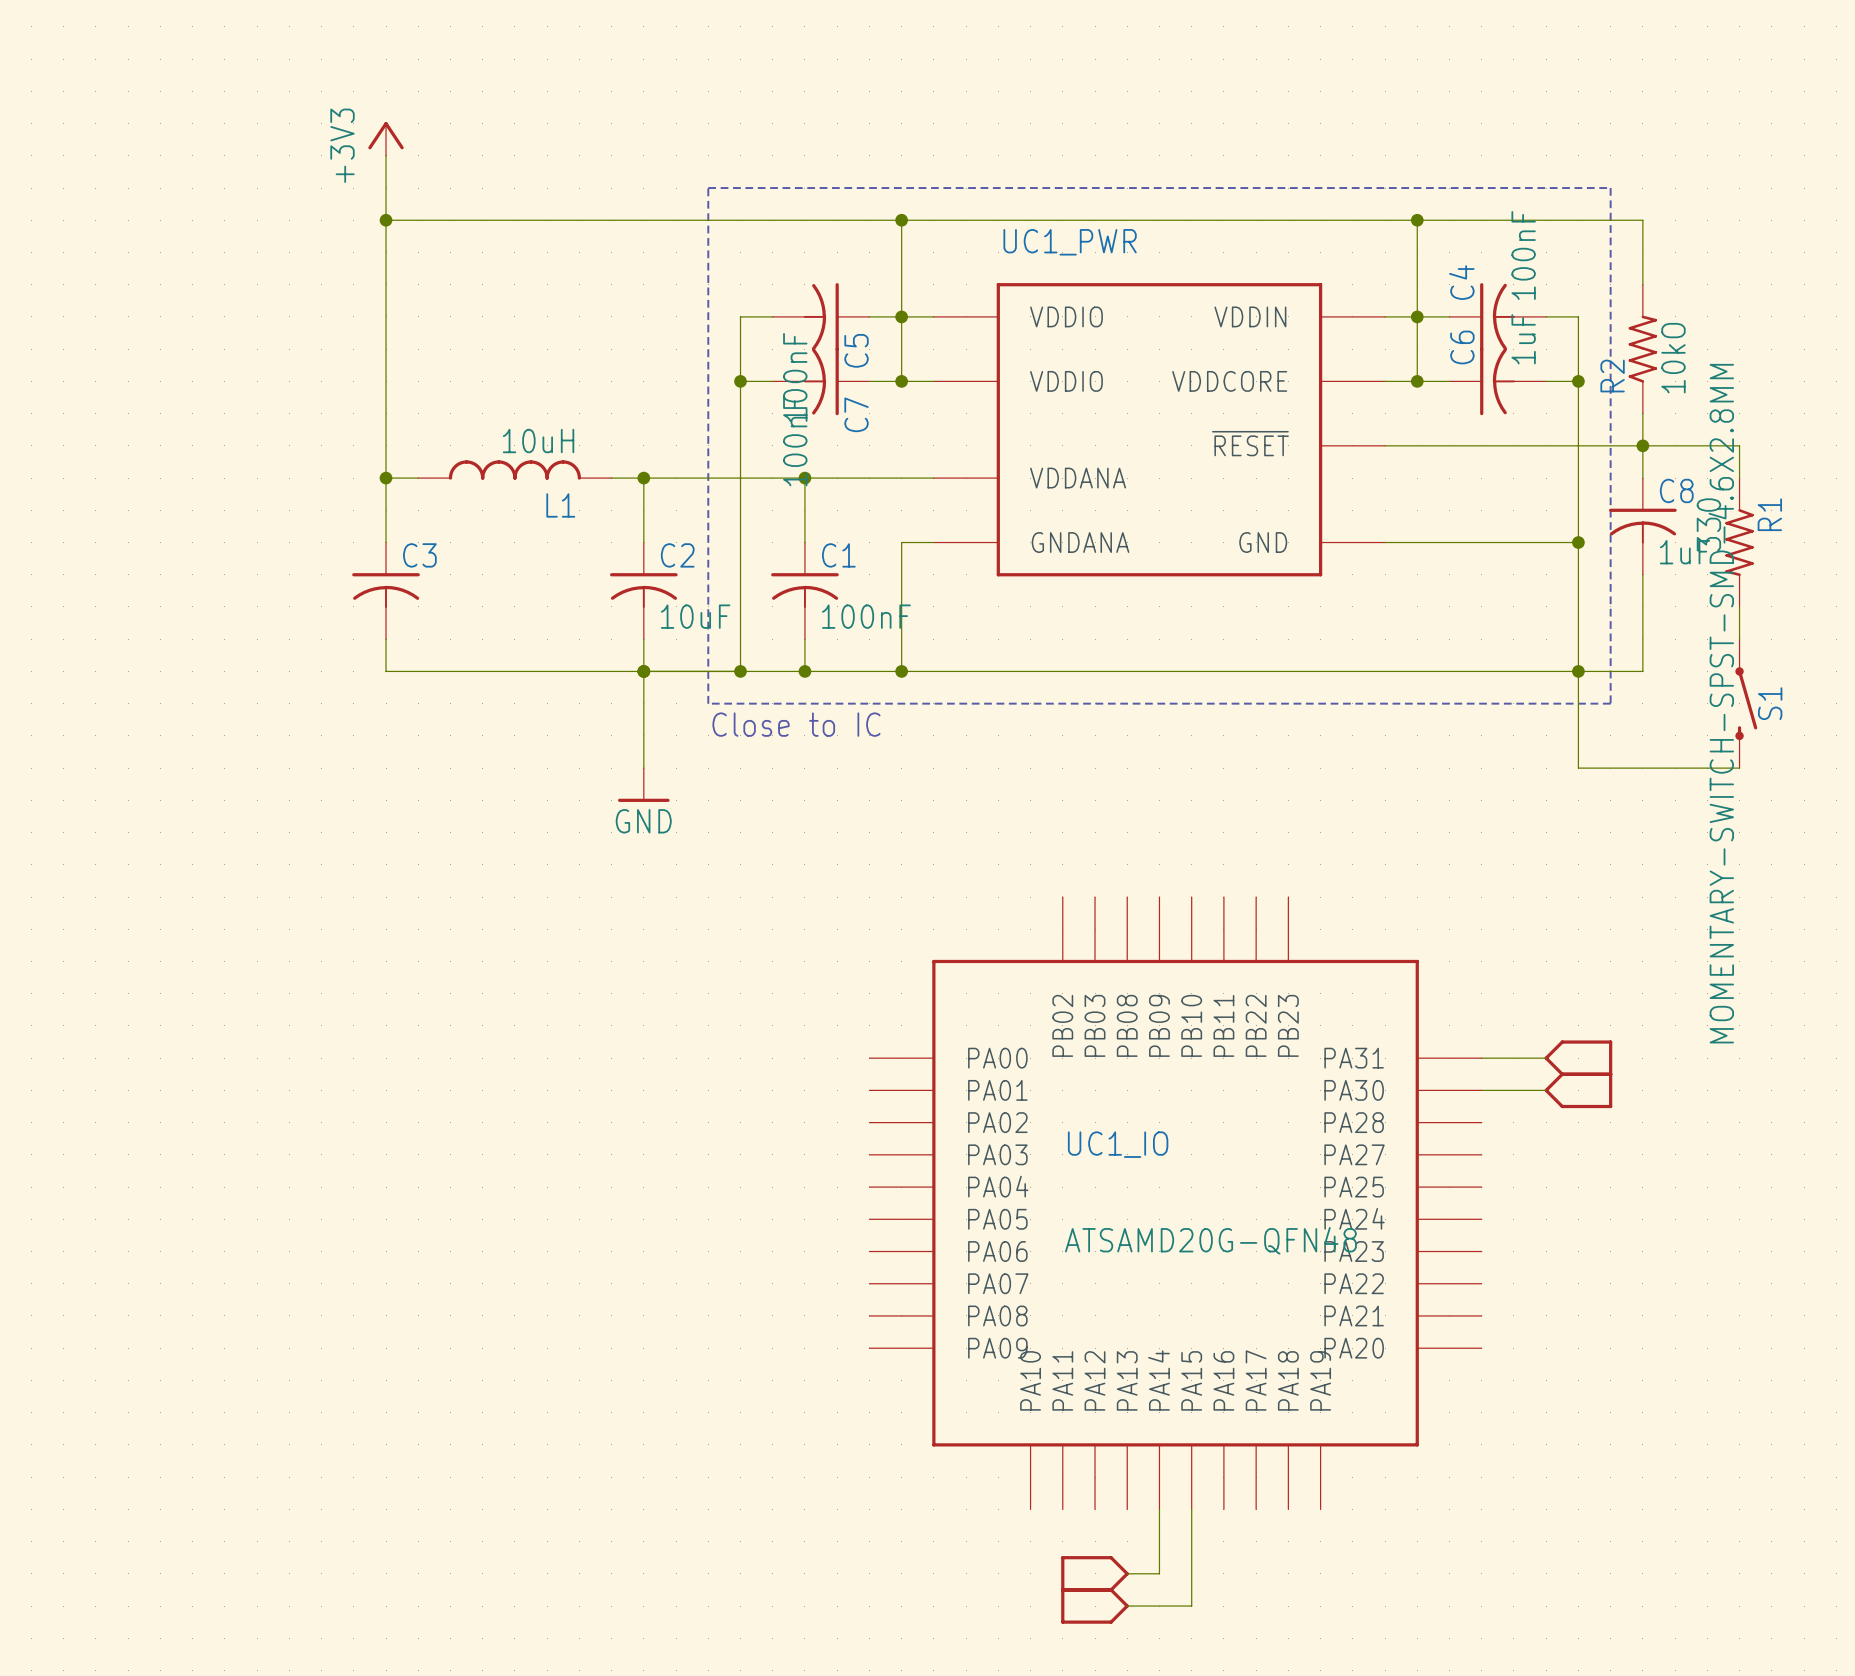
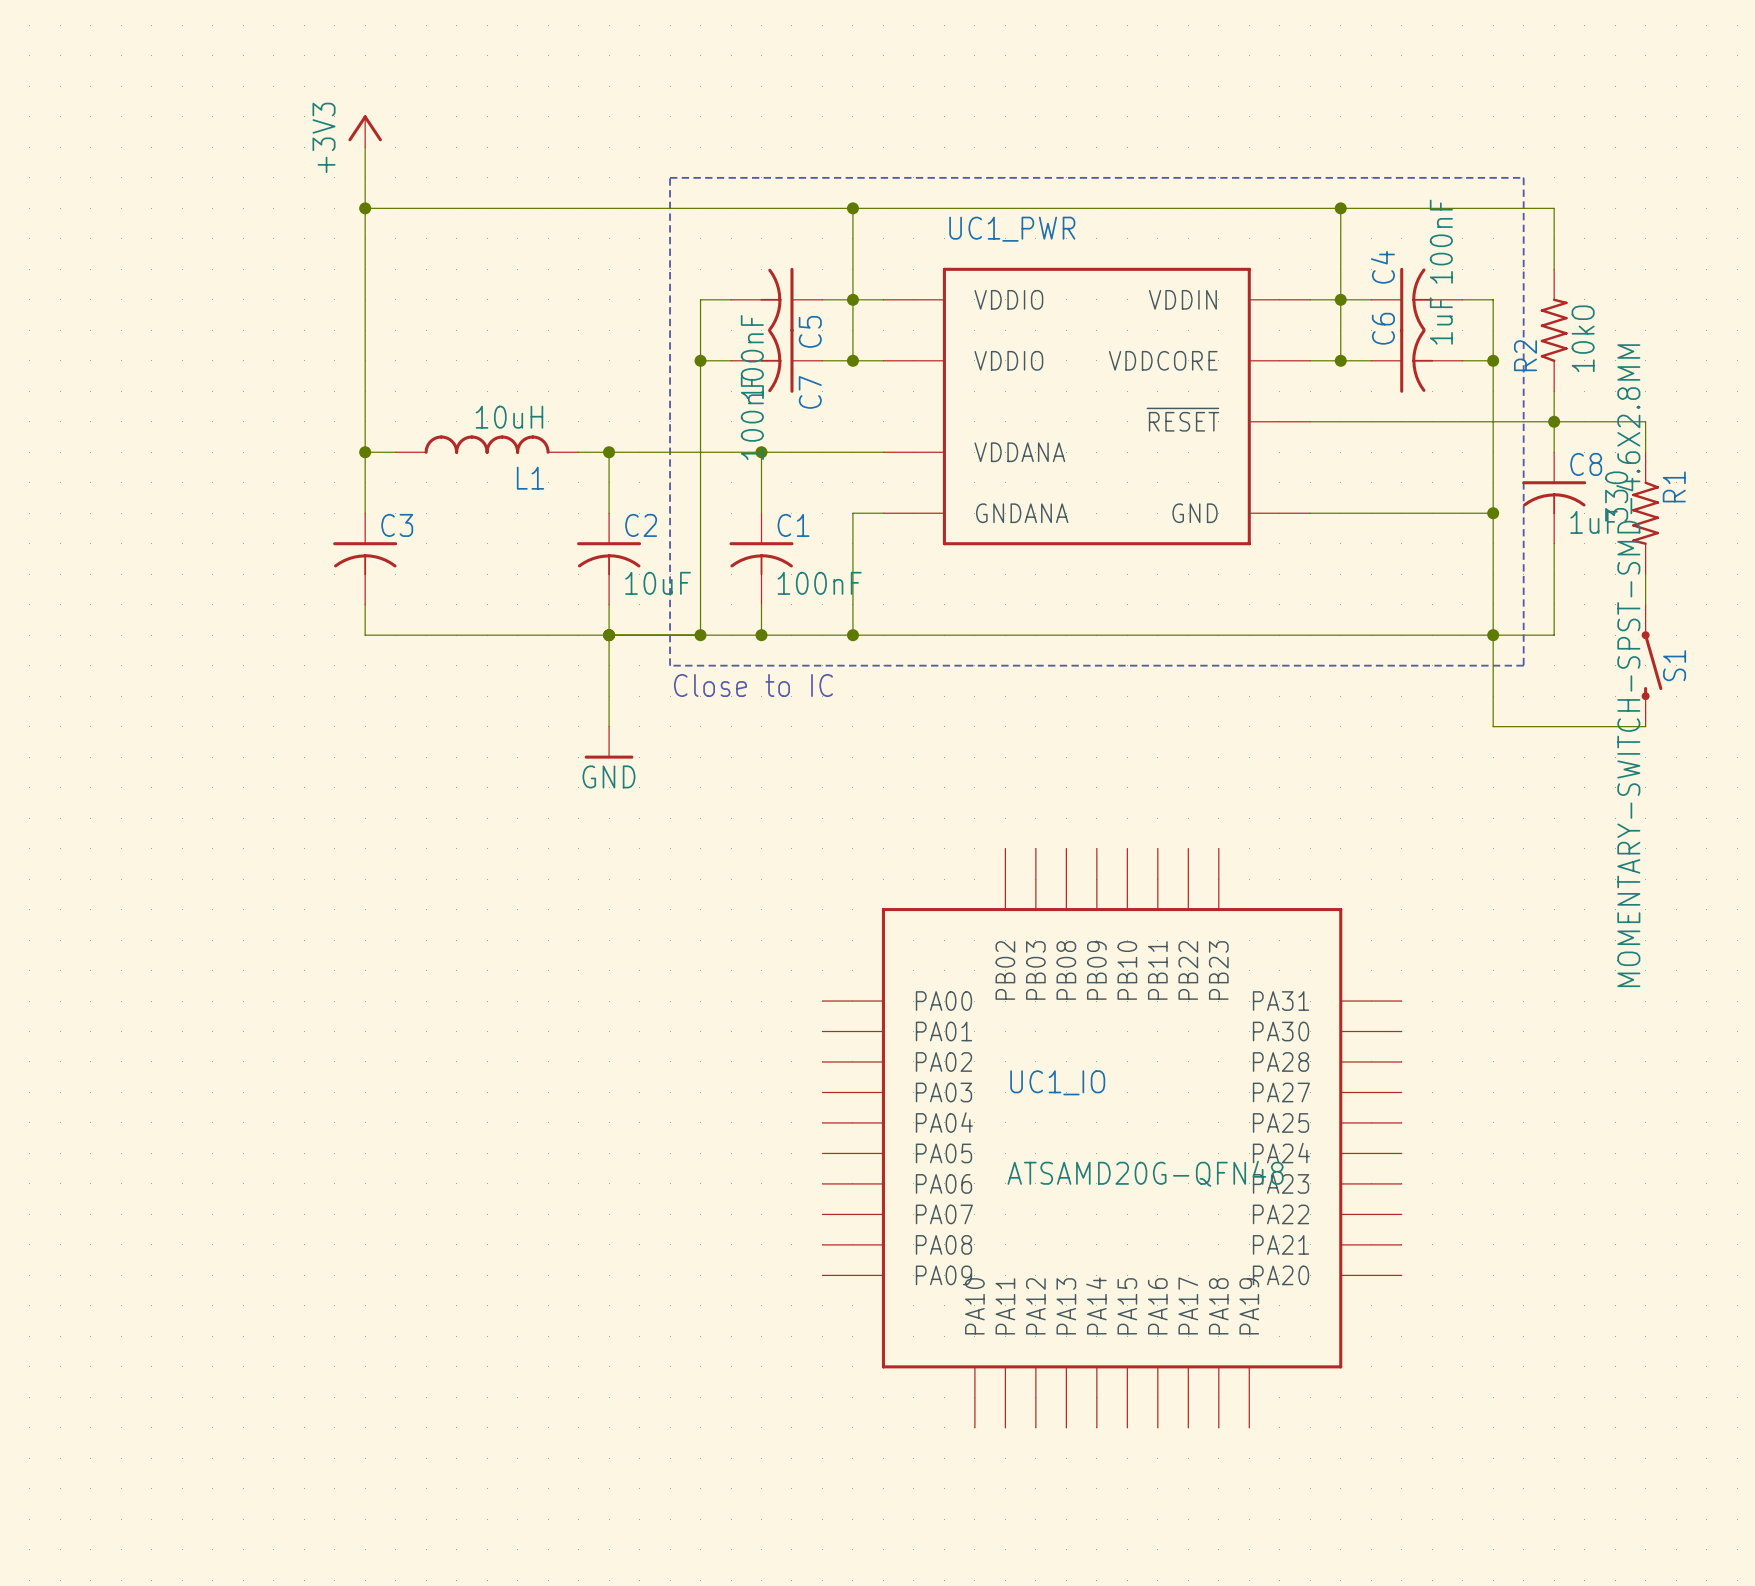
wire: (1481, 1058) (1546, 1058) -> none
part: (1578, 1058) -> none
wire: (1481, 1090) (1546, 1090) -> none
part: (1578, 1090) -> none
wire: (1159, 1509) (1159, 1573) (1127, 1573) -> none
wire: (1191, 1509) (1191, 1606) (1127, 1606) -> none
part: (1095, 1573) -> none
part: (1095, 1606) -> none

